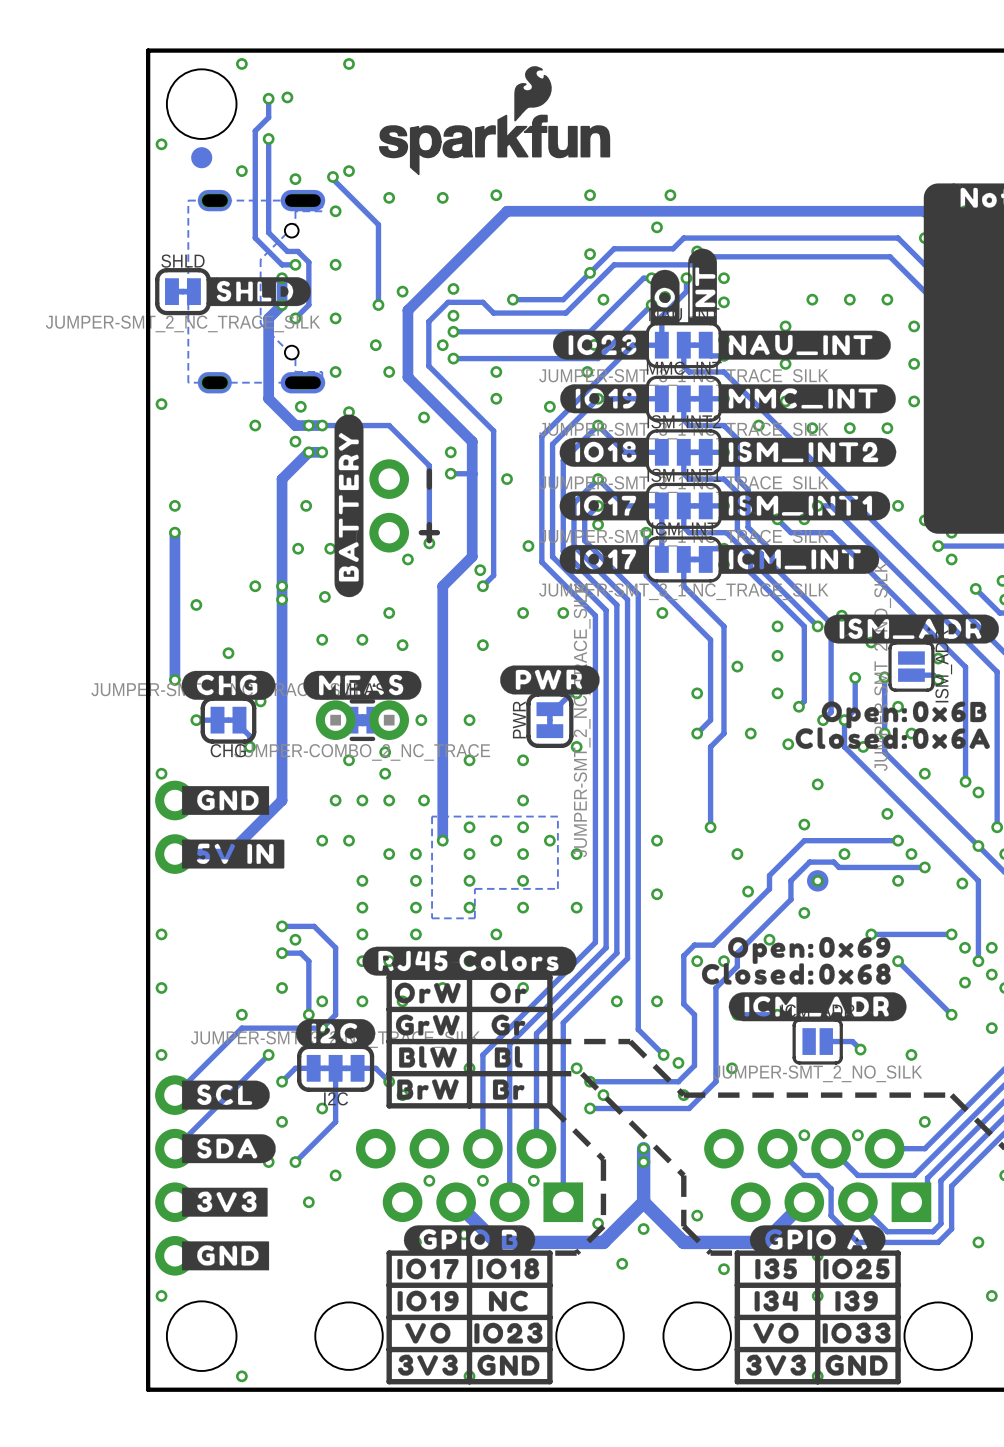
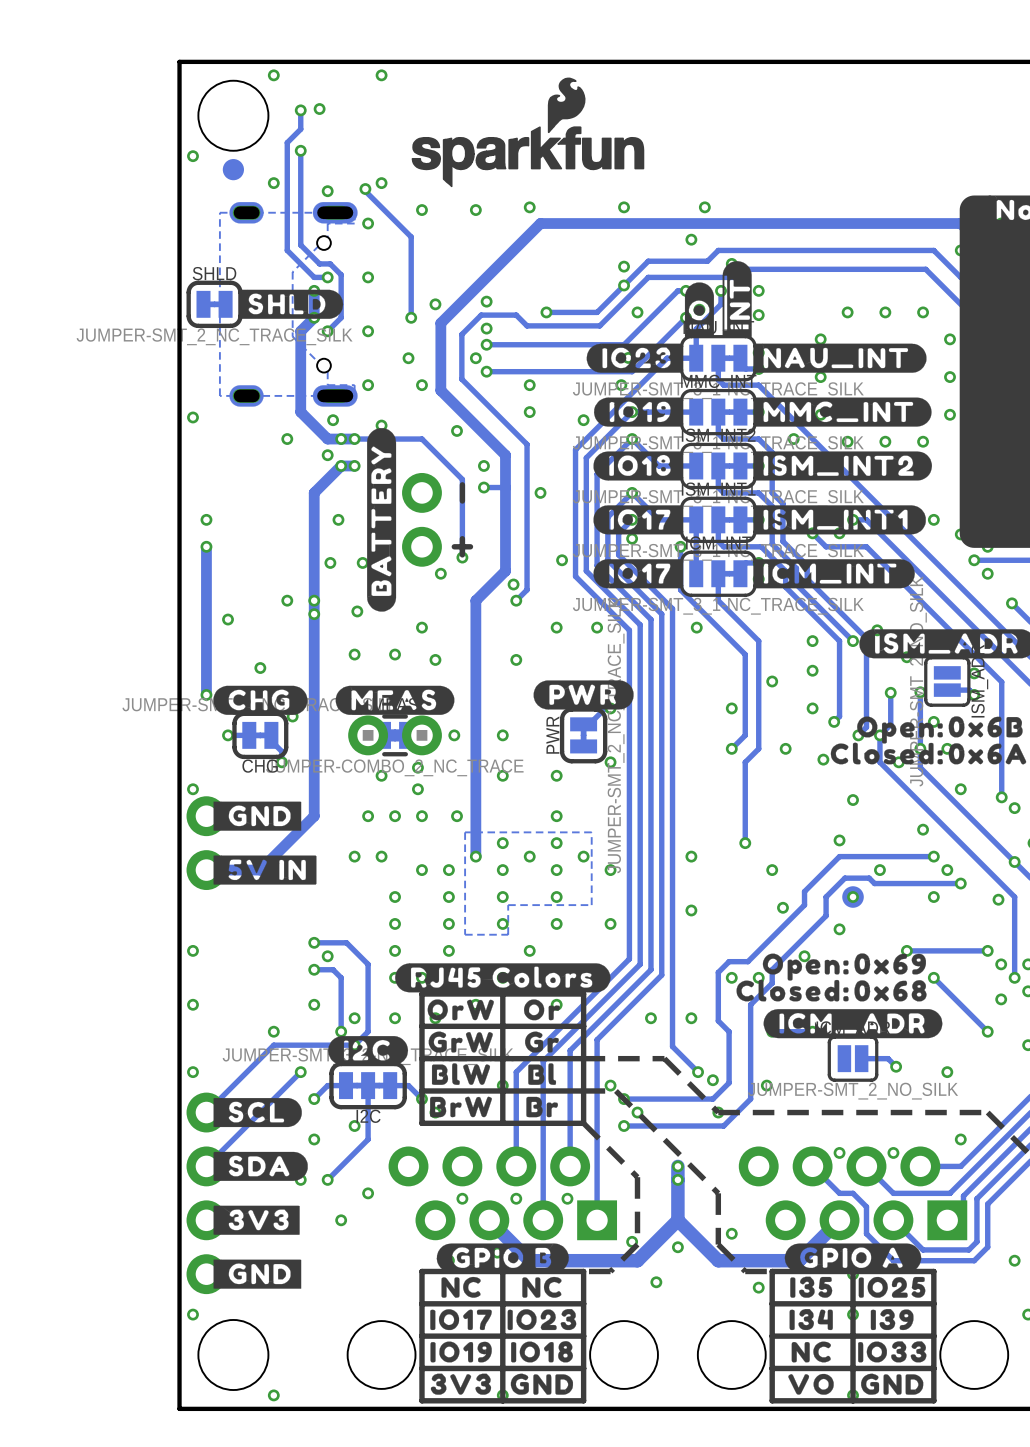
drawing: none -> [441, 1276, 481, 1298]
drawing position: (427, 1268) -> (461, 1319)
drawing position: (508, 1268) -> (542, 1351)
drawing position: (428, 1301) -> (461, 1351)
drawing position: (508, 1301) -> (541, 1287)
drawing: [405, 1322, 451, 1344] -> none
drawing: none -> [791, 1341, 831, 1363]
drawing position: (508, 1333) -> (541, 1319)
drawing position: (775, 1333) -> (811, 1384)
drawing: [746, 1354, 807, 1376] -> none

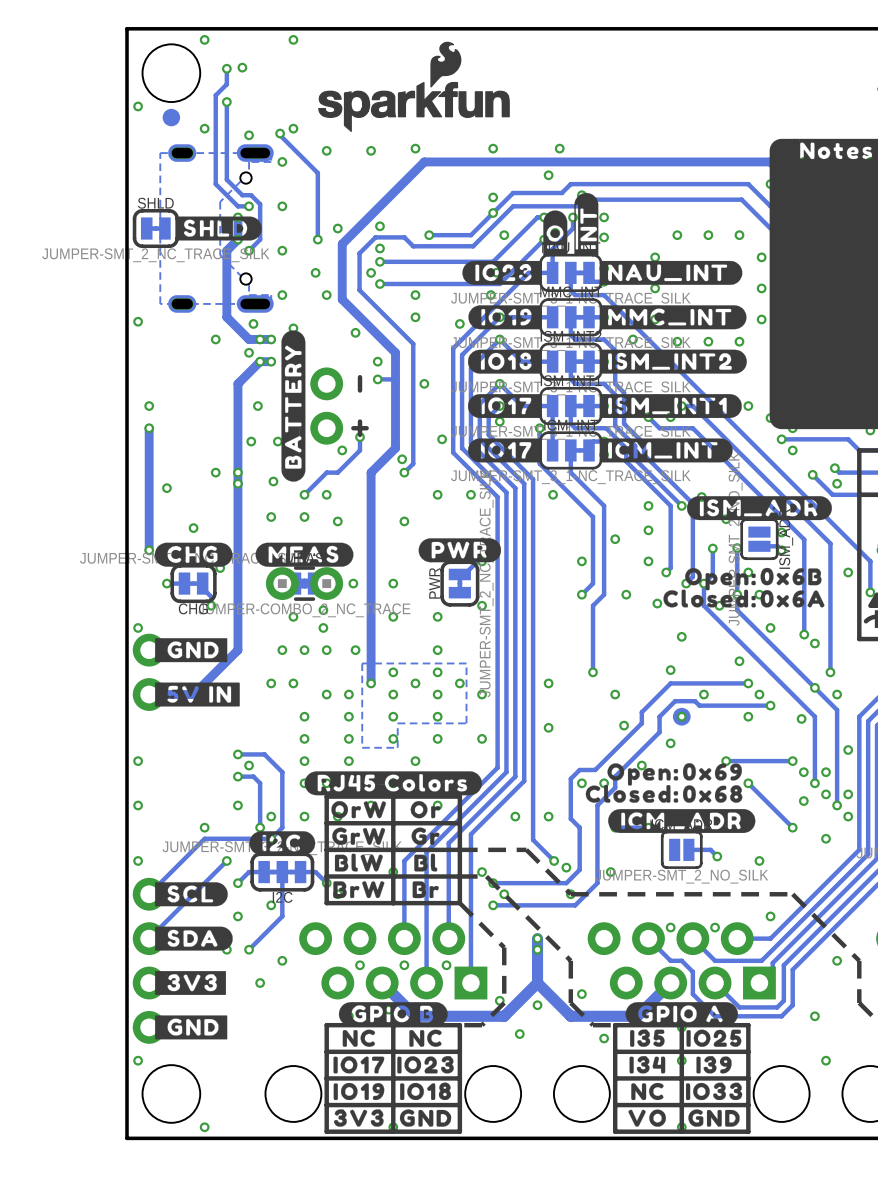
track: (354, 439) (421, 439) (462, 479) (462, 557) -> none
track: none -> (360, 439) (360, 450) (337, 472) (326, 472) (304, 494)
via: none -> (304, 494)

